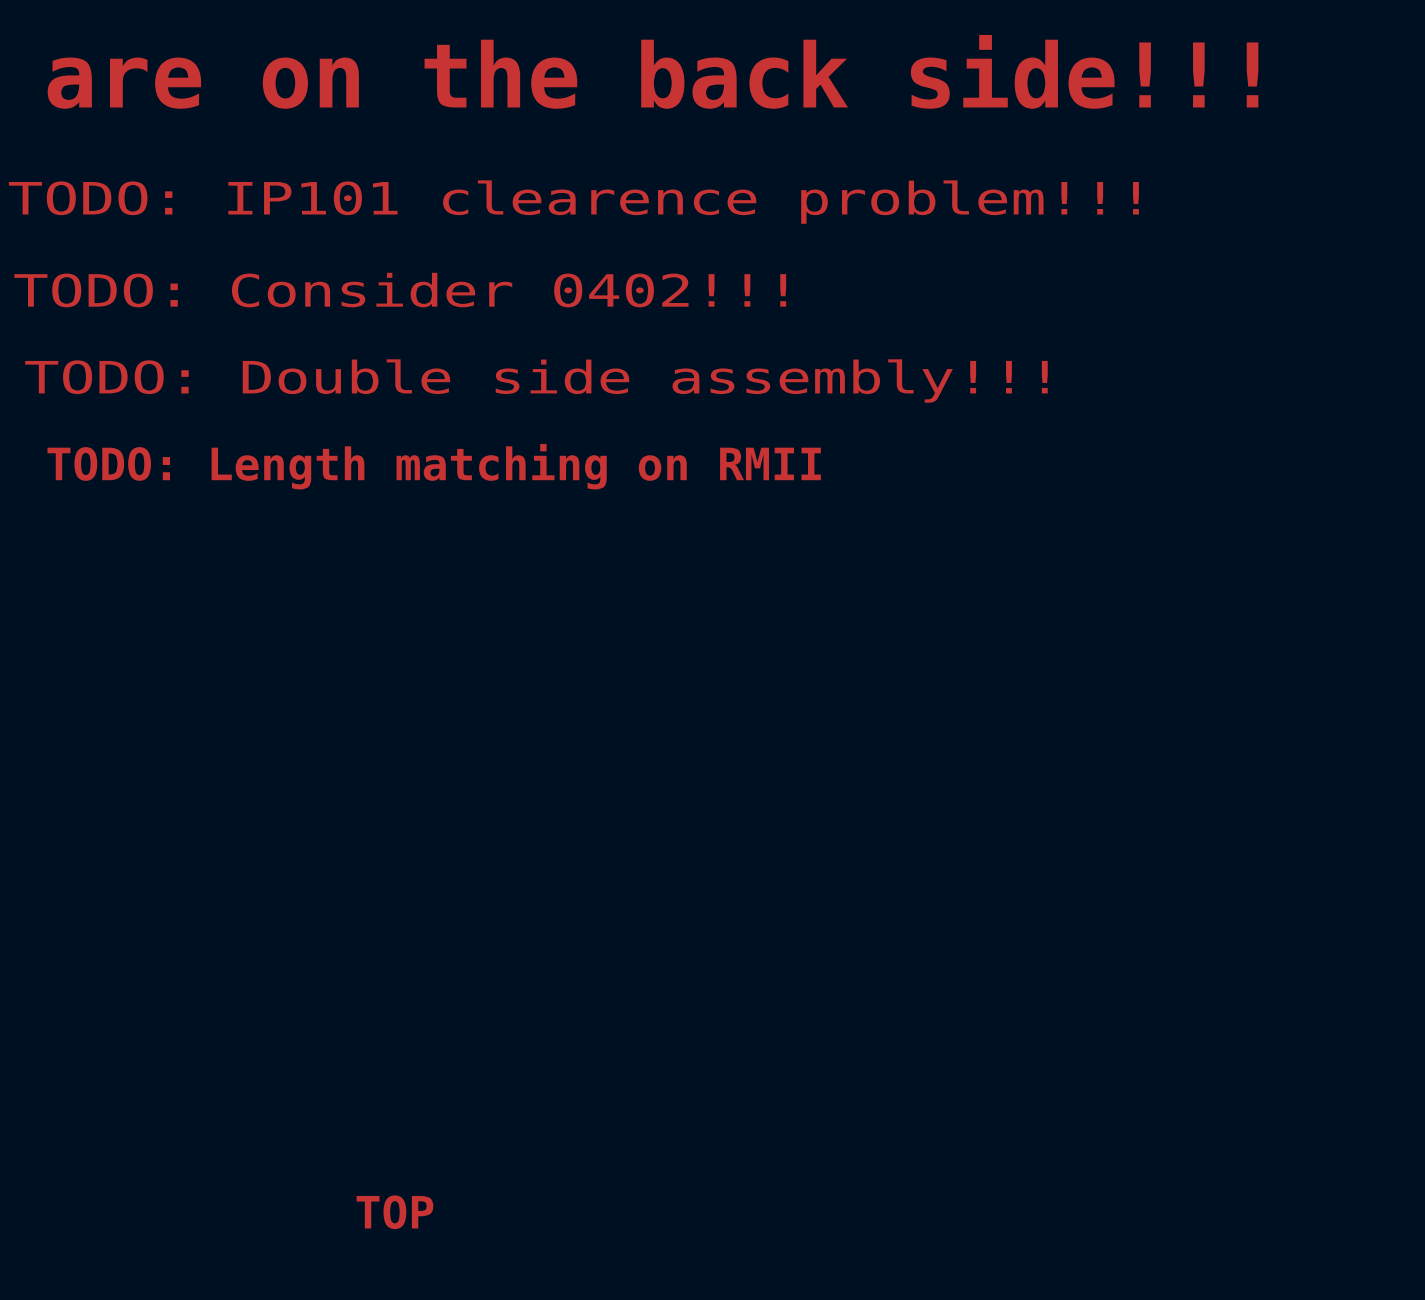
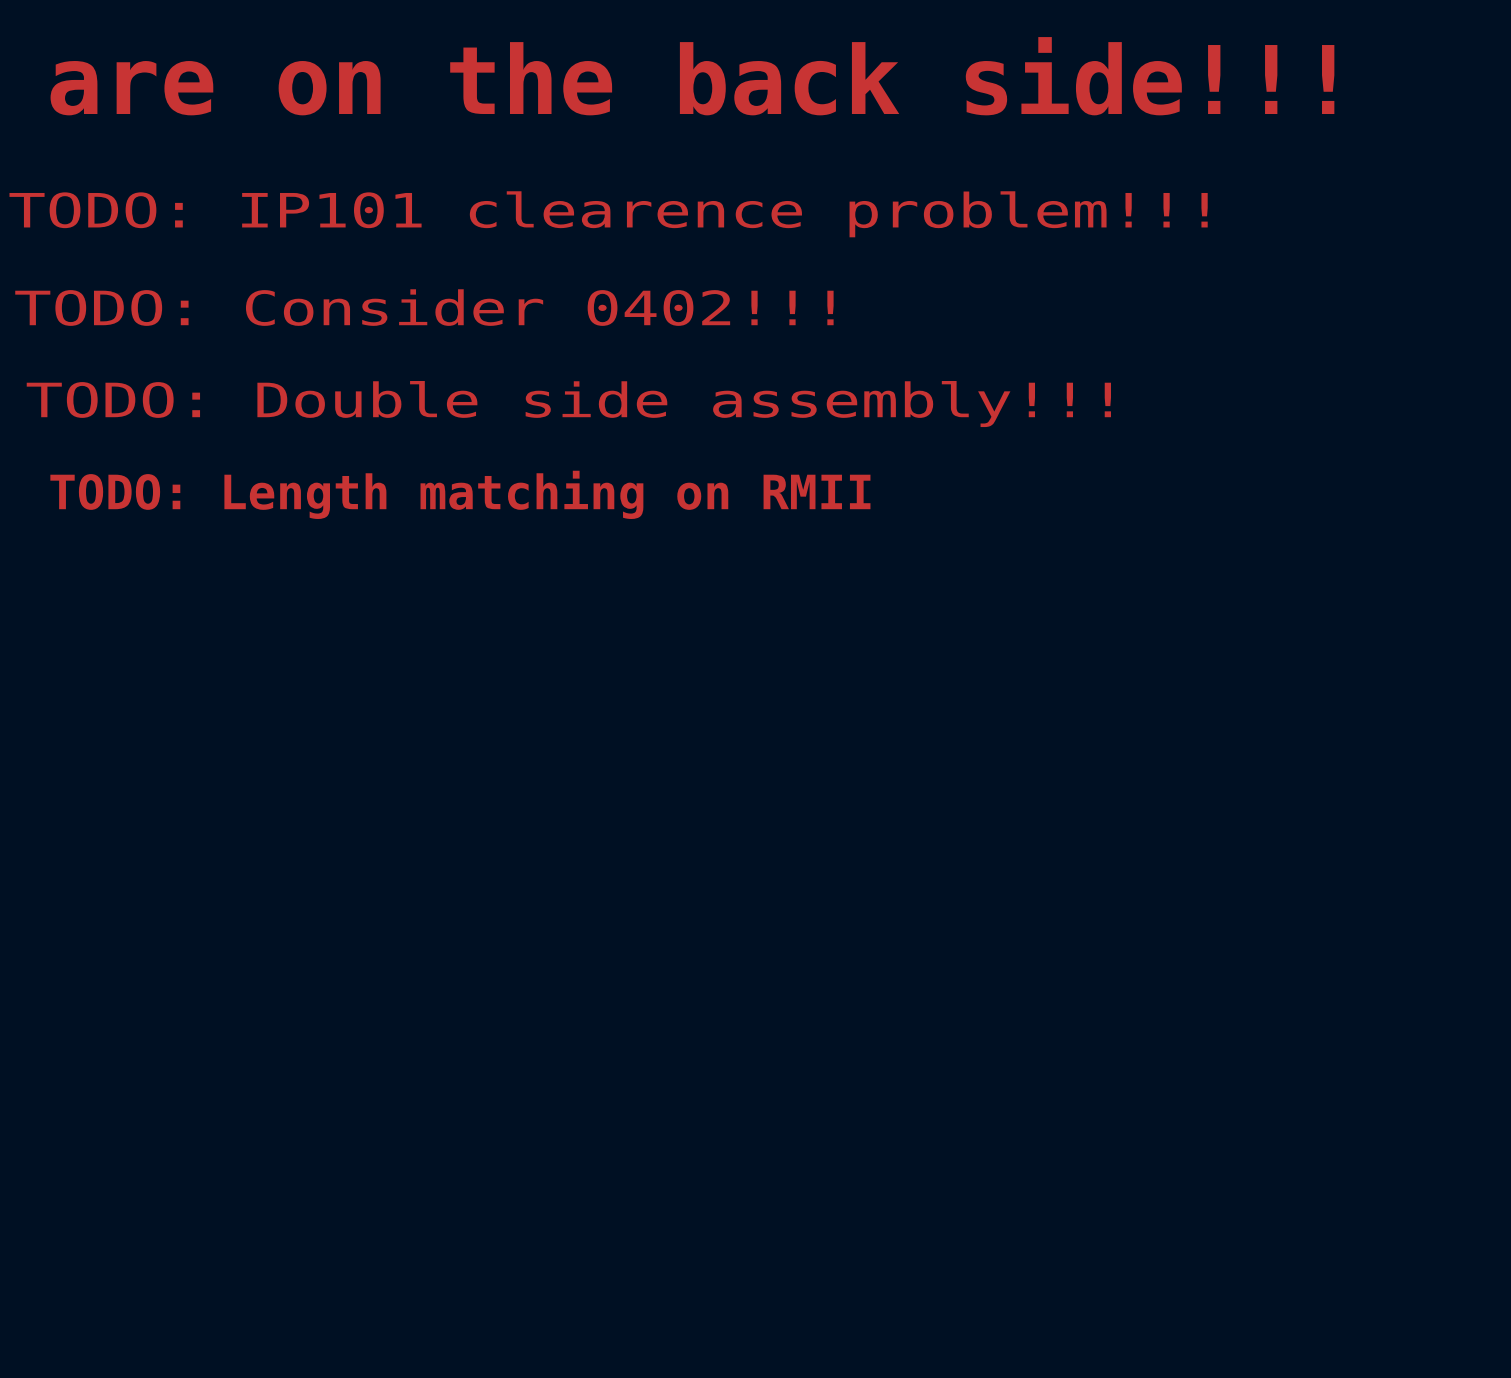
text: TOP (394, 1212) -> none

